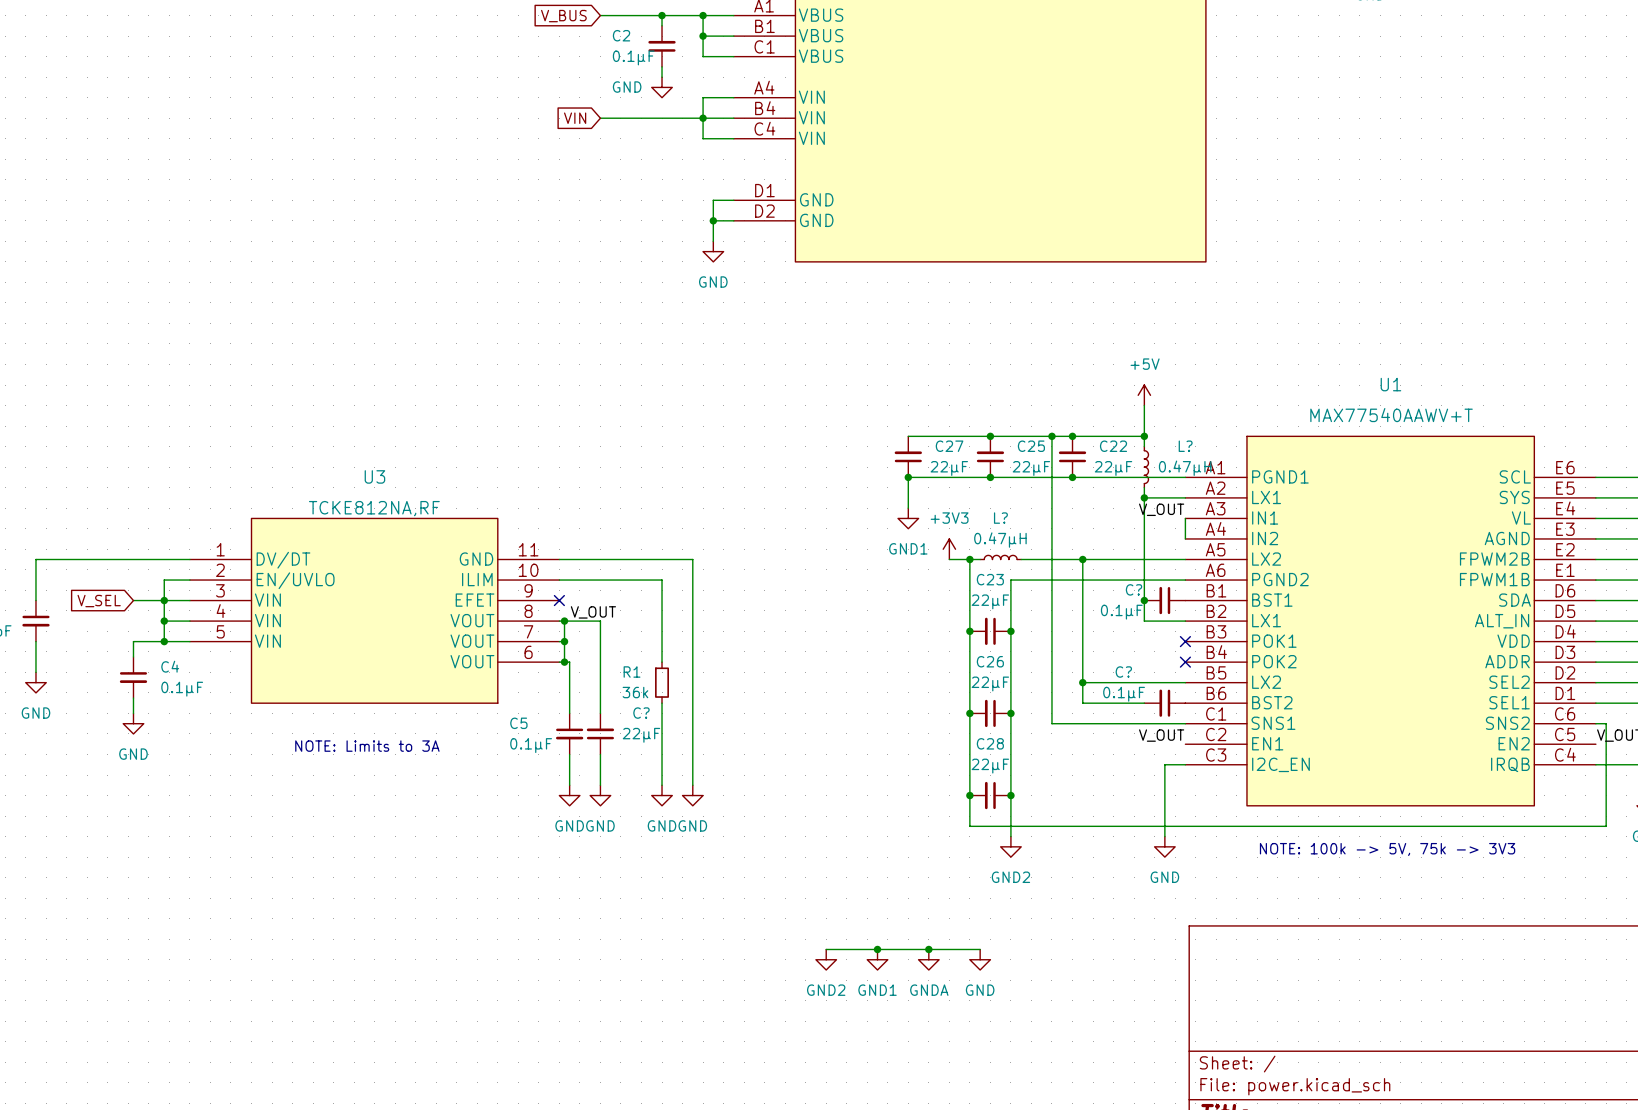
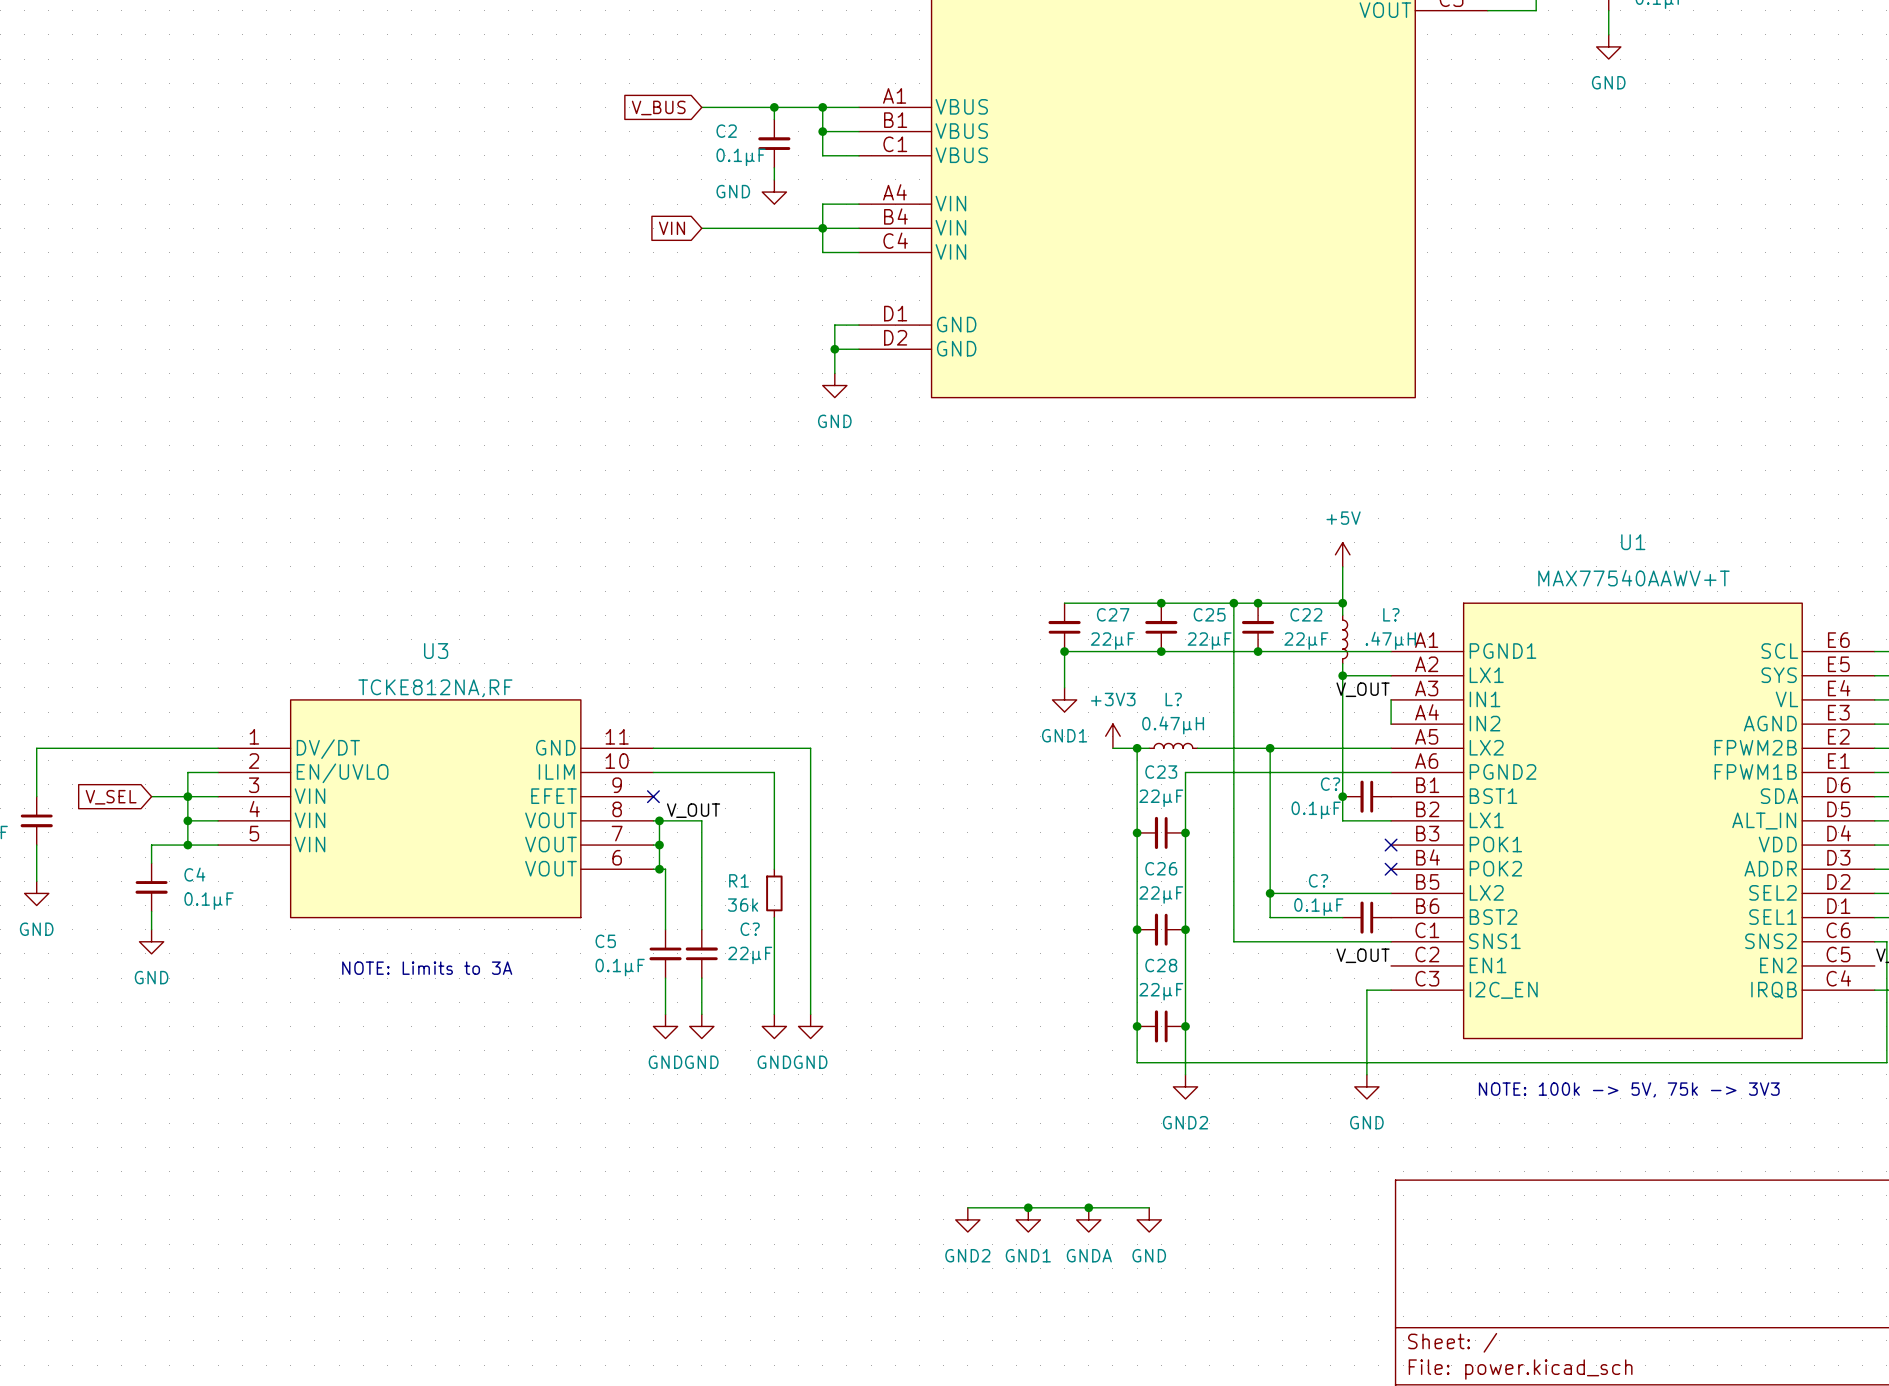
L? value: 0.47µH (1185, 468) -> .47µH (1390, 640)

